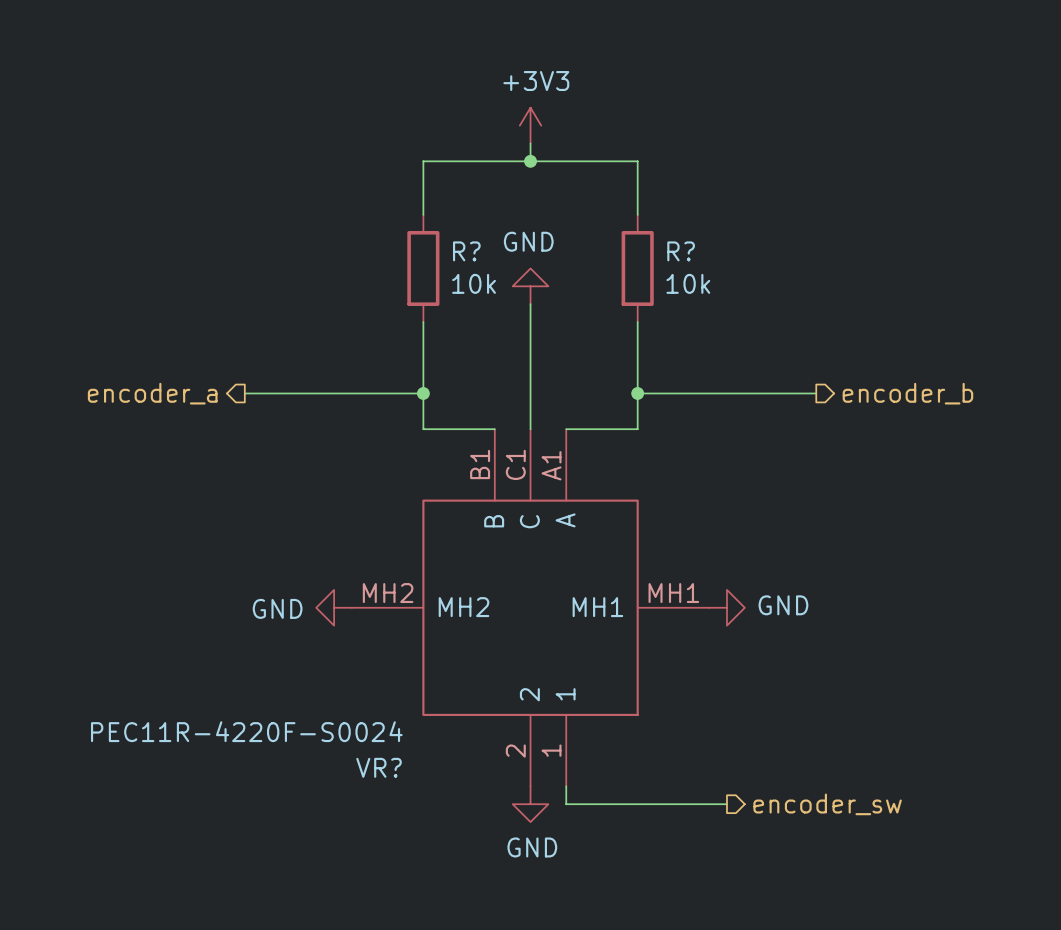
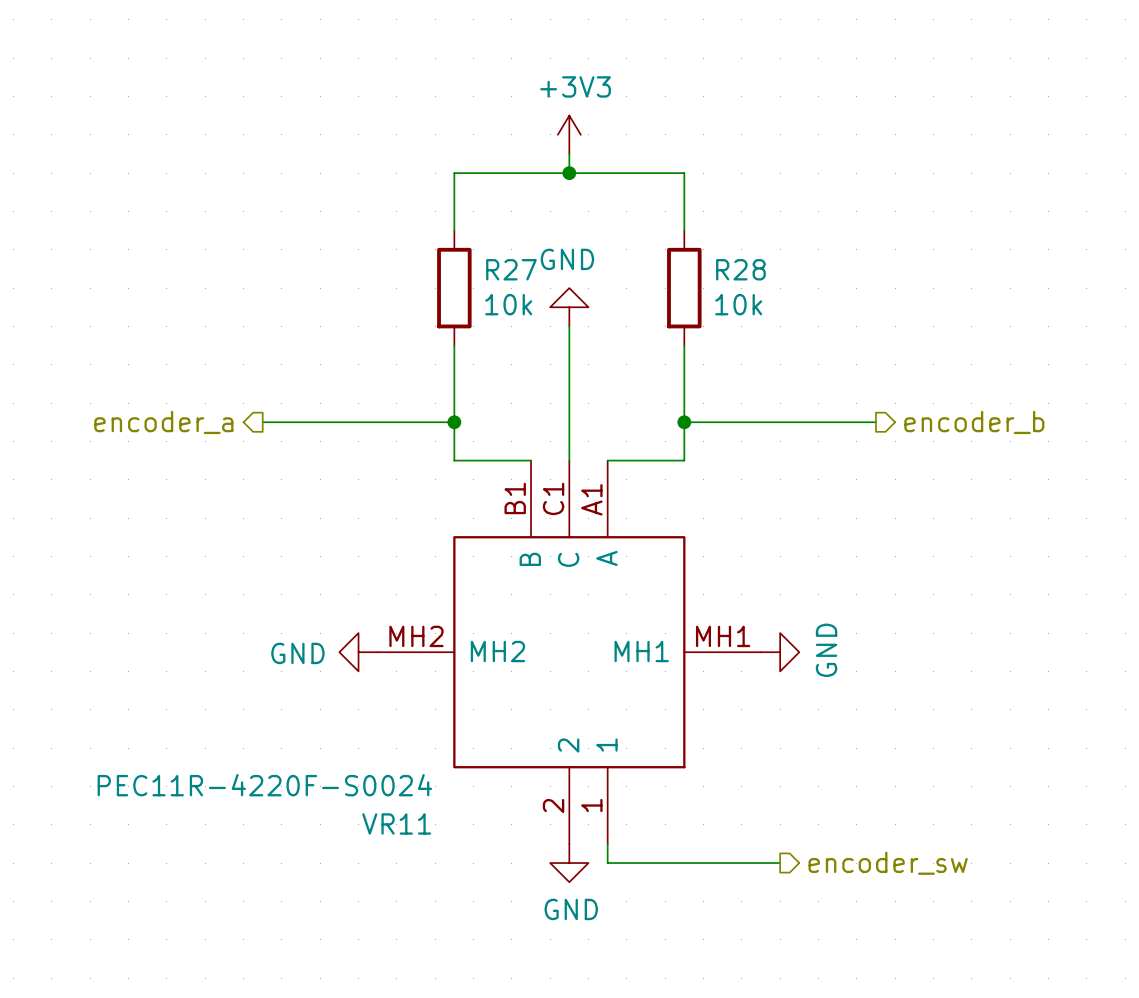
R? name: R? (466, 251) -> R27 (511, 269)
R? name: R? (681, 251) -> R28 (740, 269)
power symbol text rotation: 0° (783, 605) -> 90° counterclockwise (826, 650)
VR? name: VR? (379, 767) -> VR11 (396, 823)

